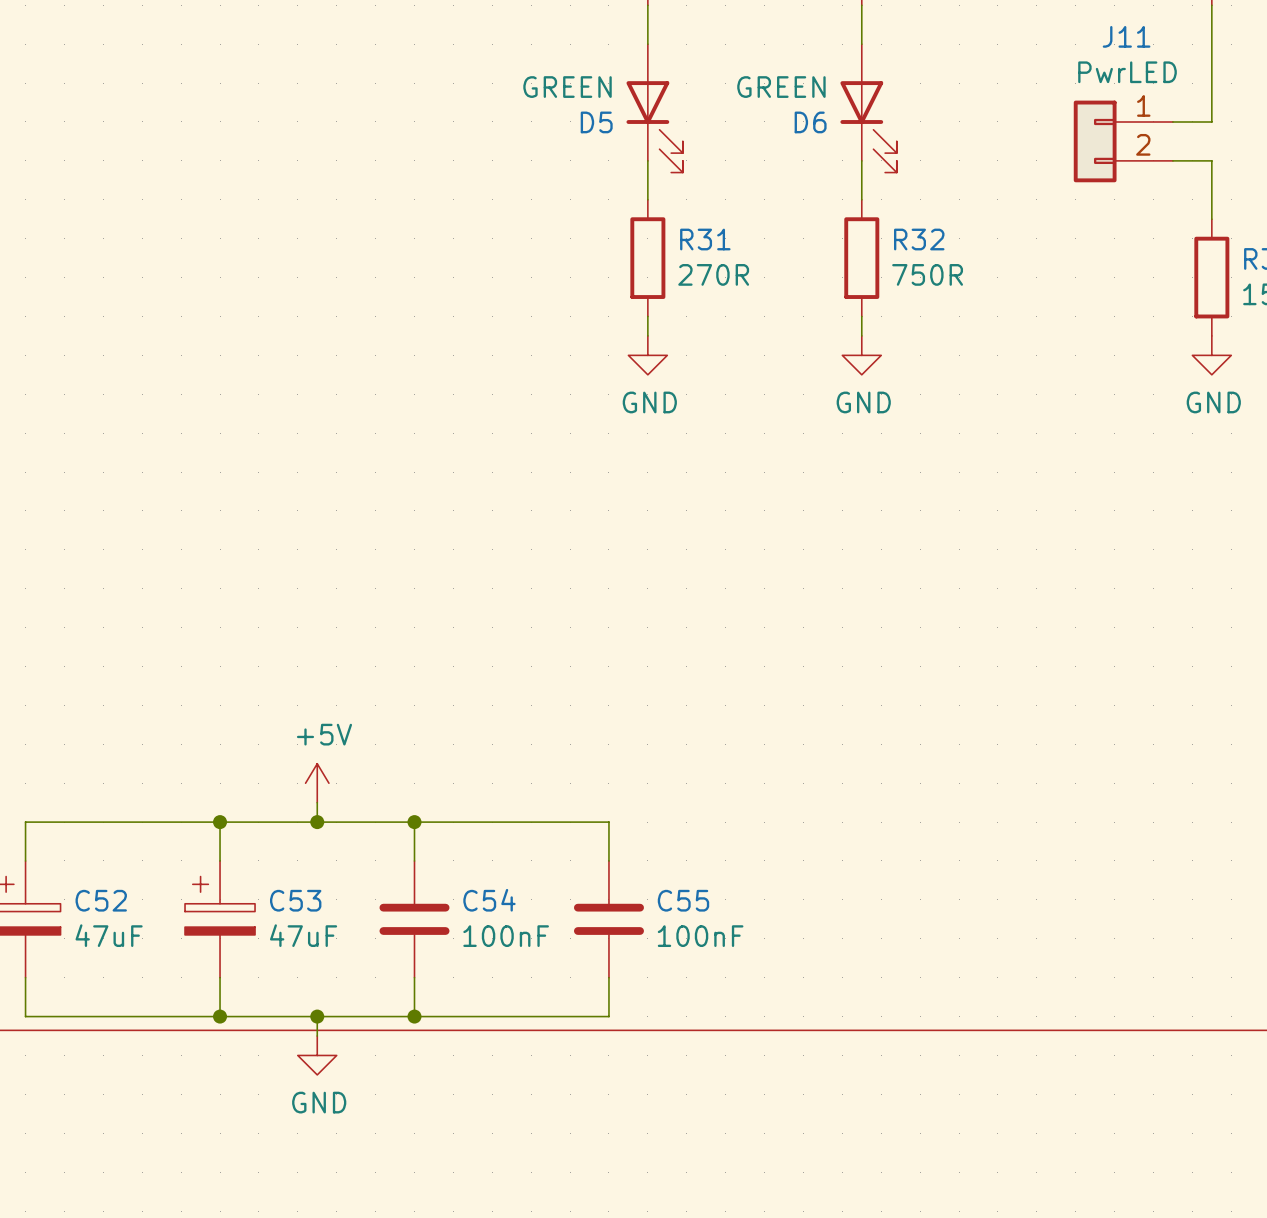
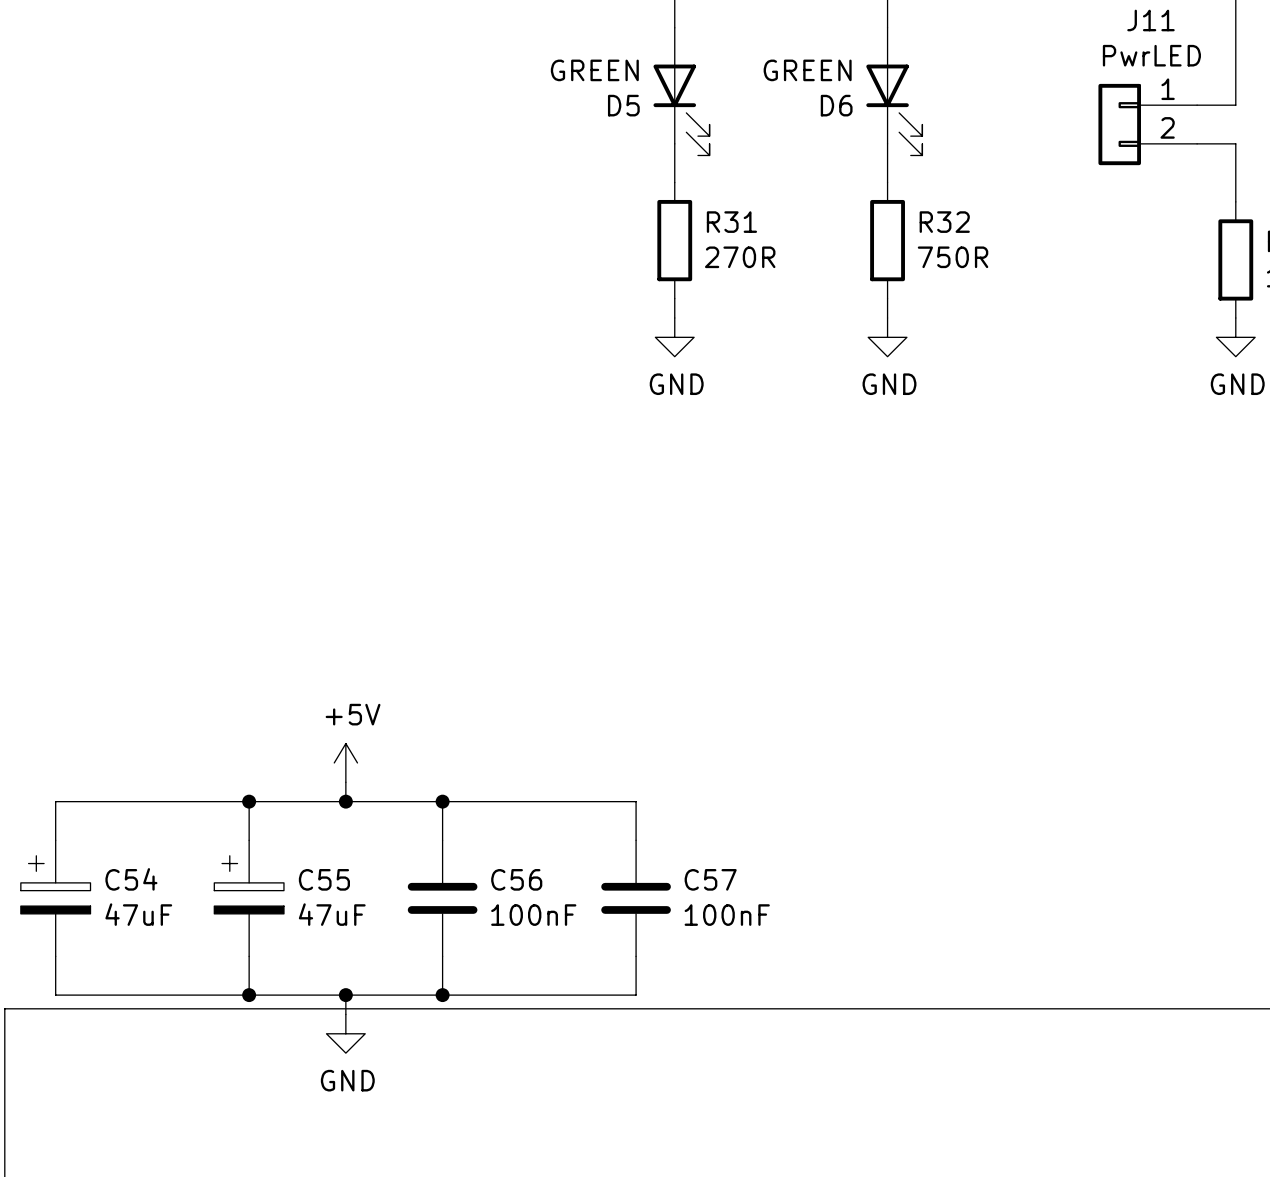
C52 name: C52 (101, 900) -> C54 (131, 879)
C53 name: C53 (295, 900) -> C55 (324, 879)
C54 name: C54 (489, 900) -> C56 (516, 879)
C55 name: C55 (683, 900) -> C57 (710, 879)

